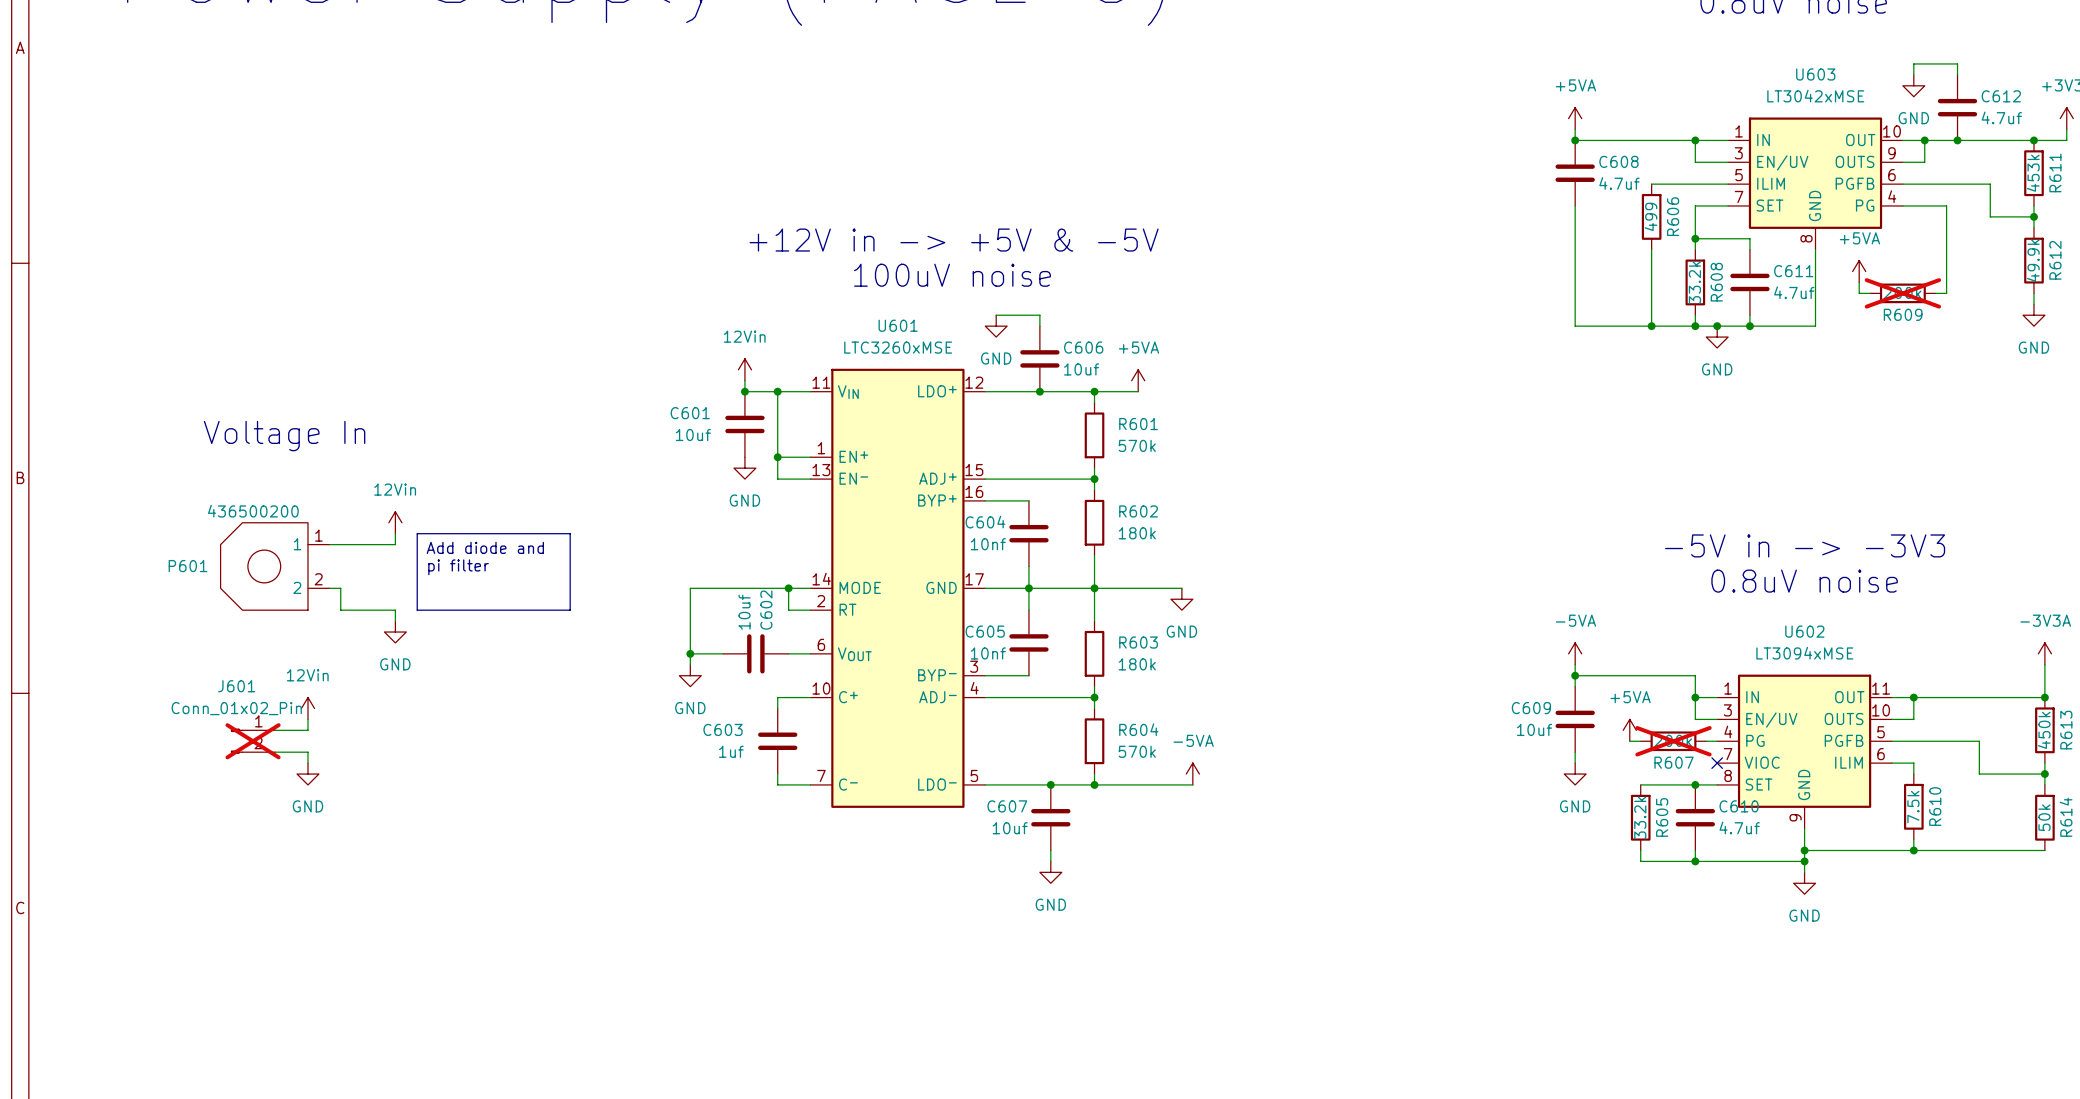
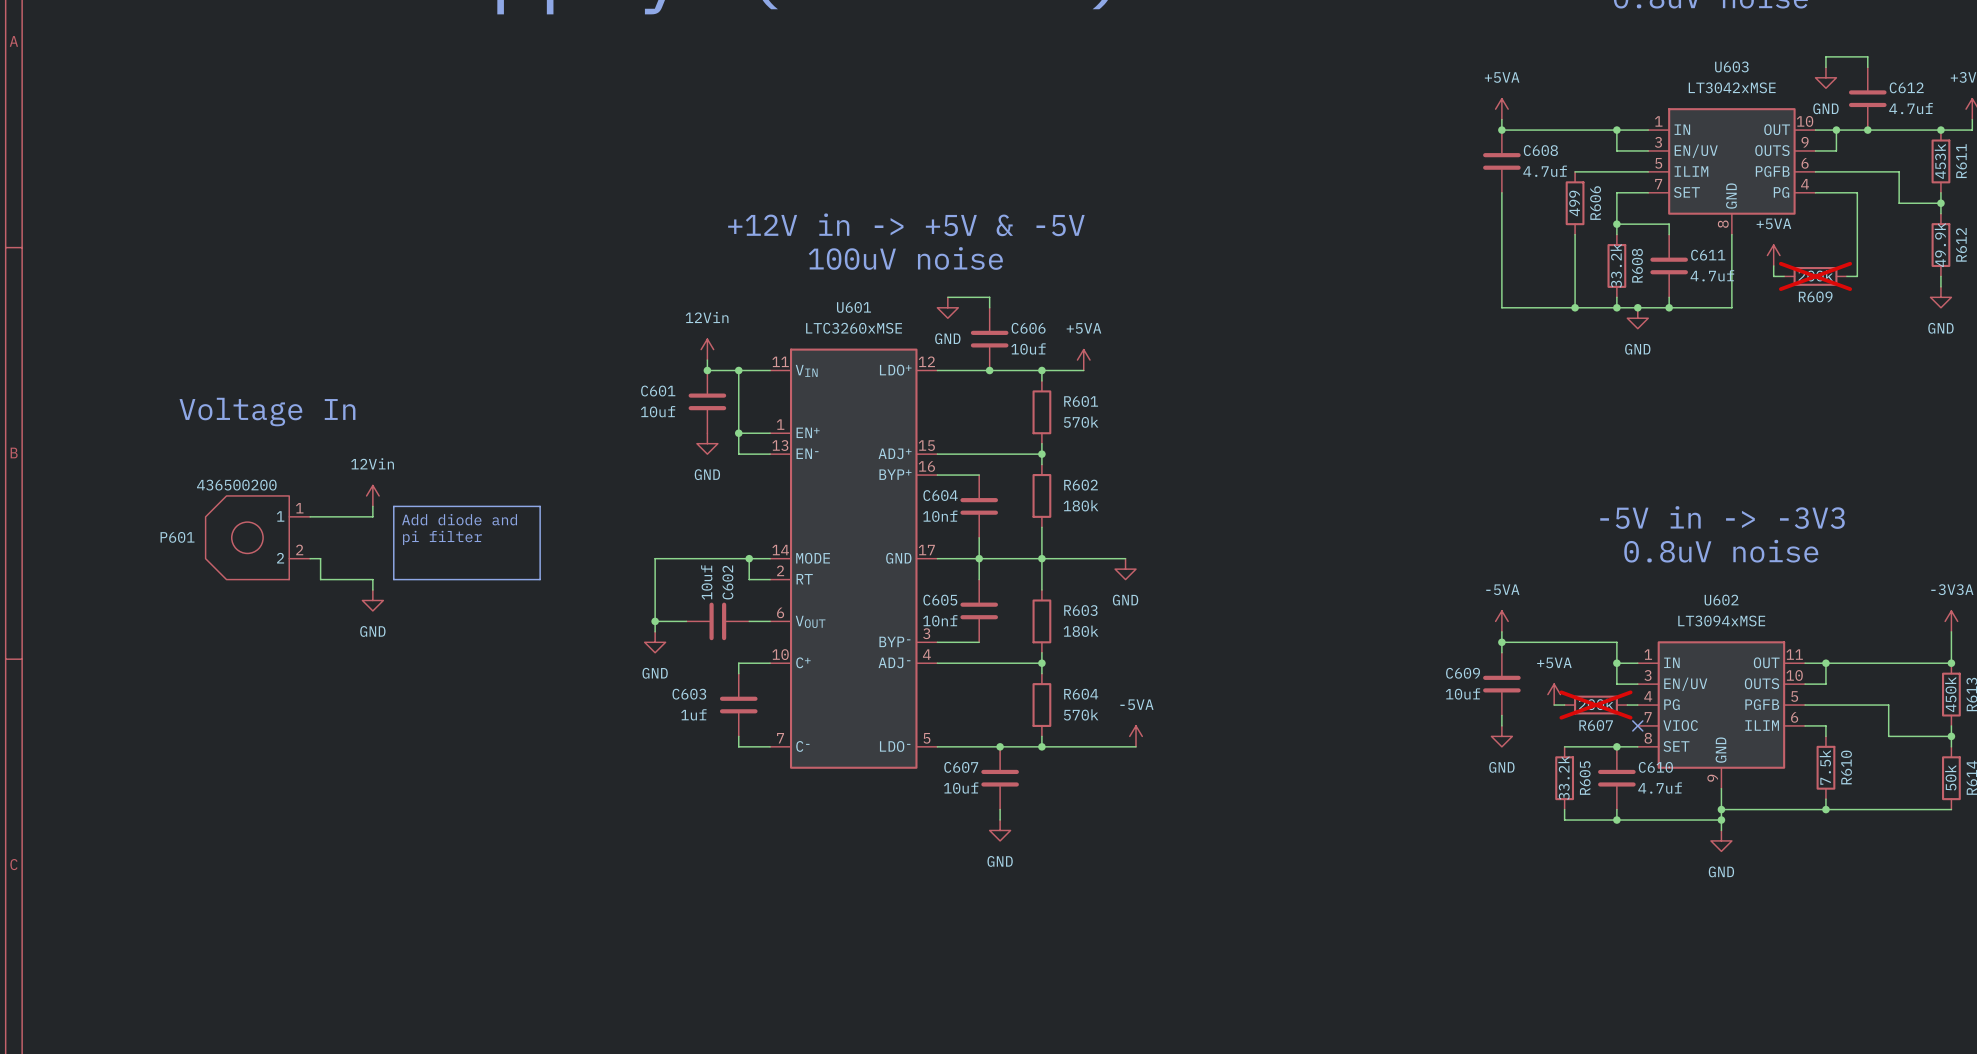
power symbol: 12Vin (307, 708) -> none
wire: (307, 719) (307, 730) (275, 730) -> none
J601: Conn_01x02_Pin (253, 741) -> none
wire: (275, 752) (307, 752) (307, 763) -> none
power symbol: GND (307, 774) -> none

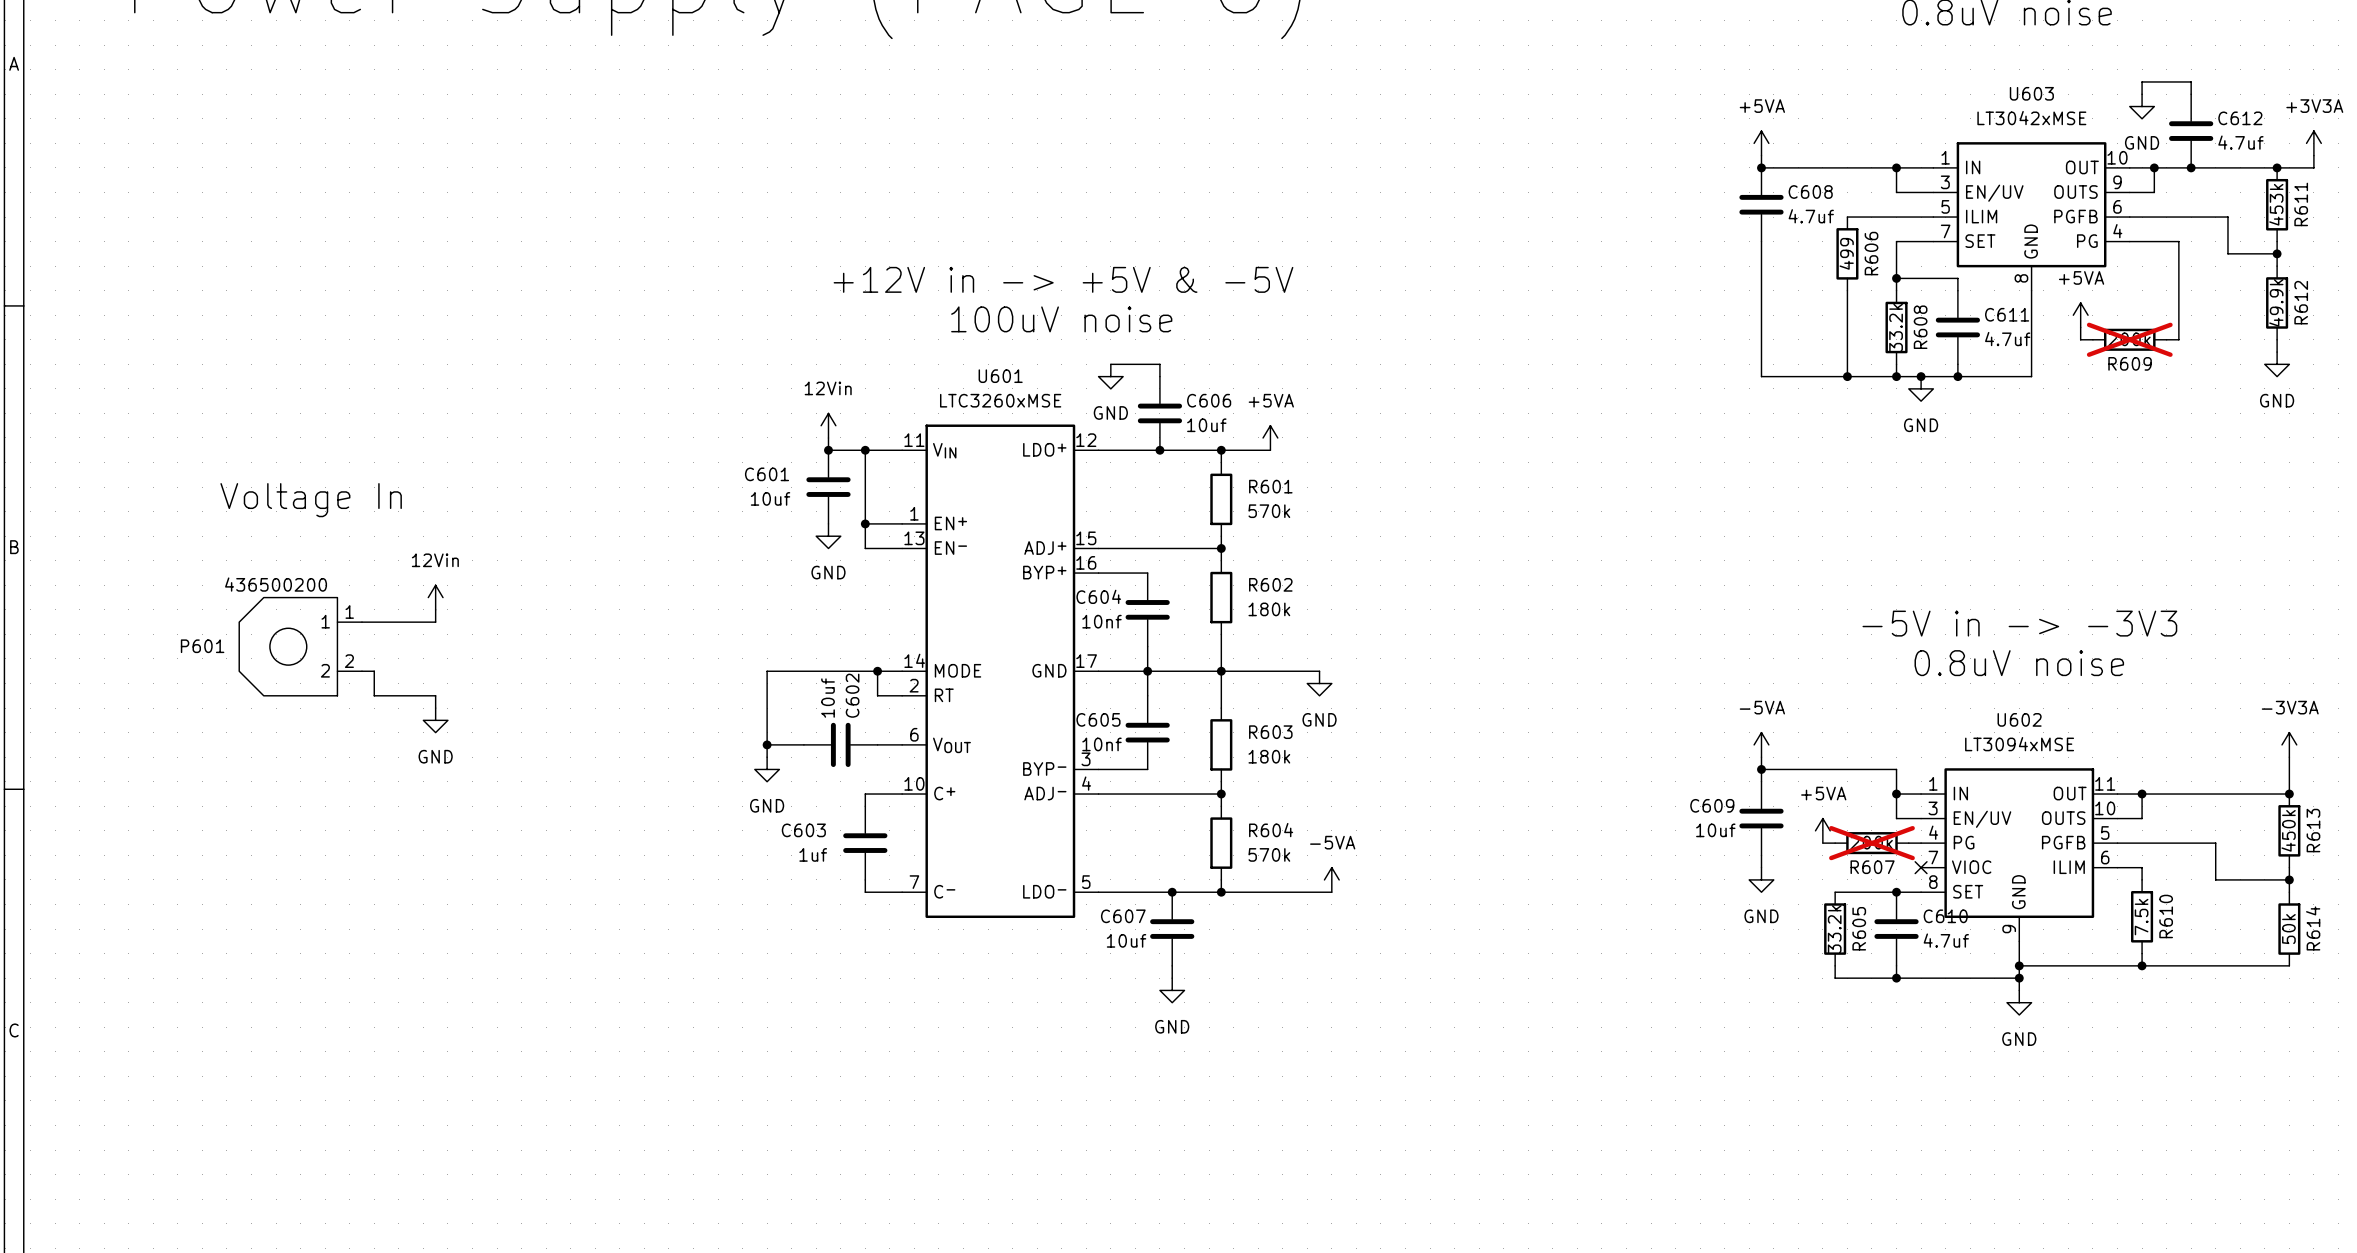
line: (393, 506) (540, 506) (540, 579) (393, 579) (393, 506) -> none
text: Add diode and (459, 519) -> none
text: pi filter (442, 537) -> none

